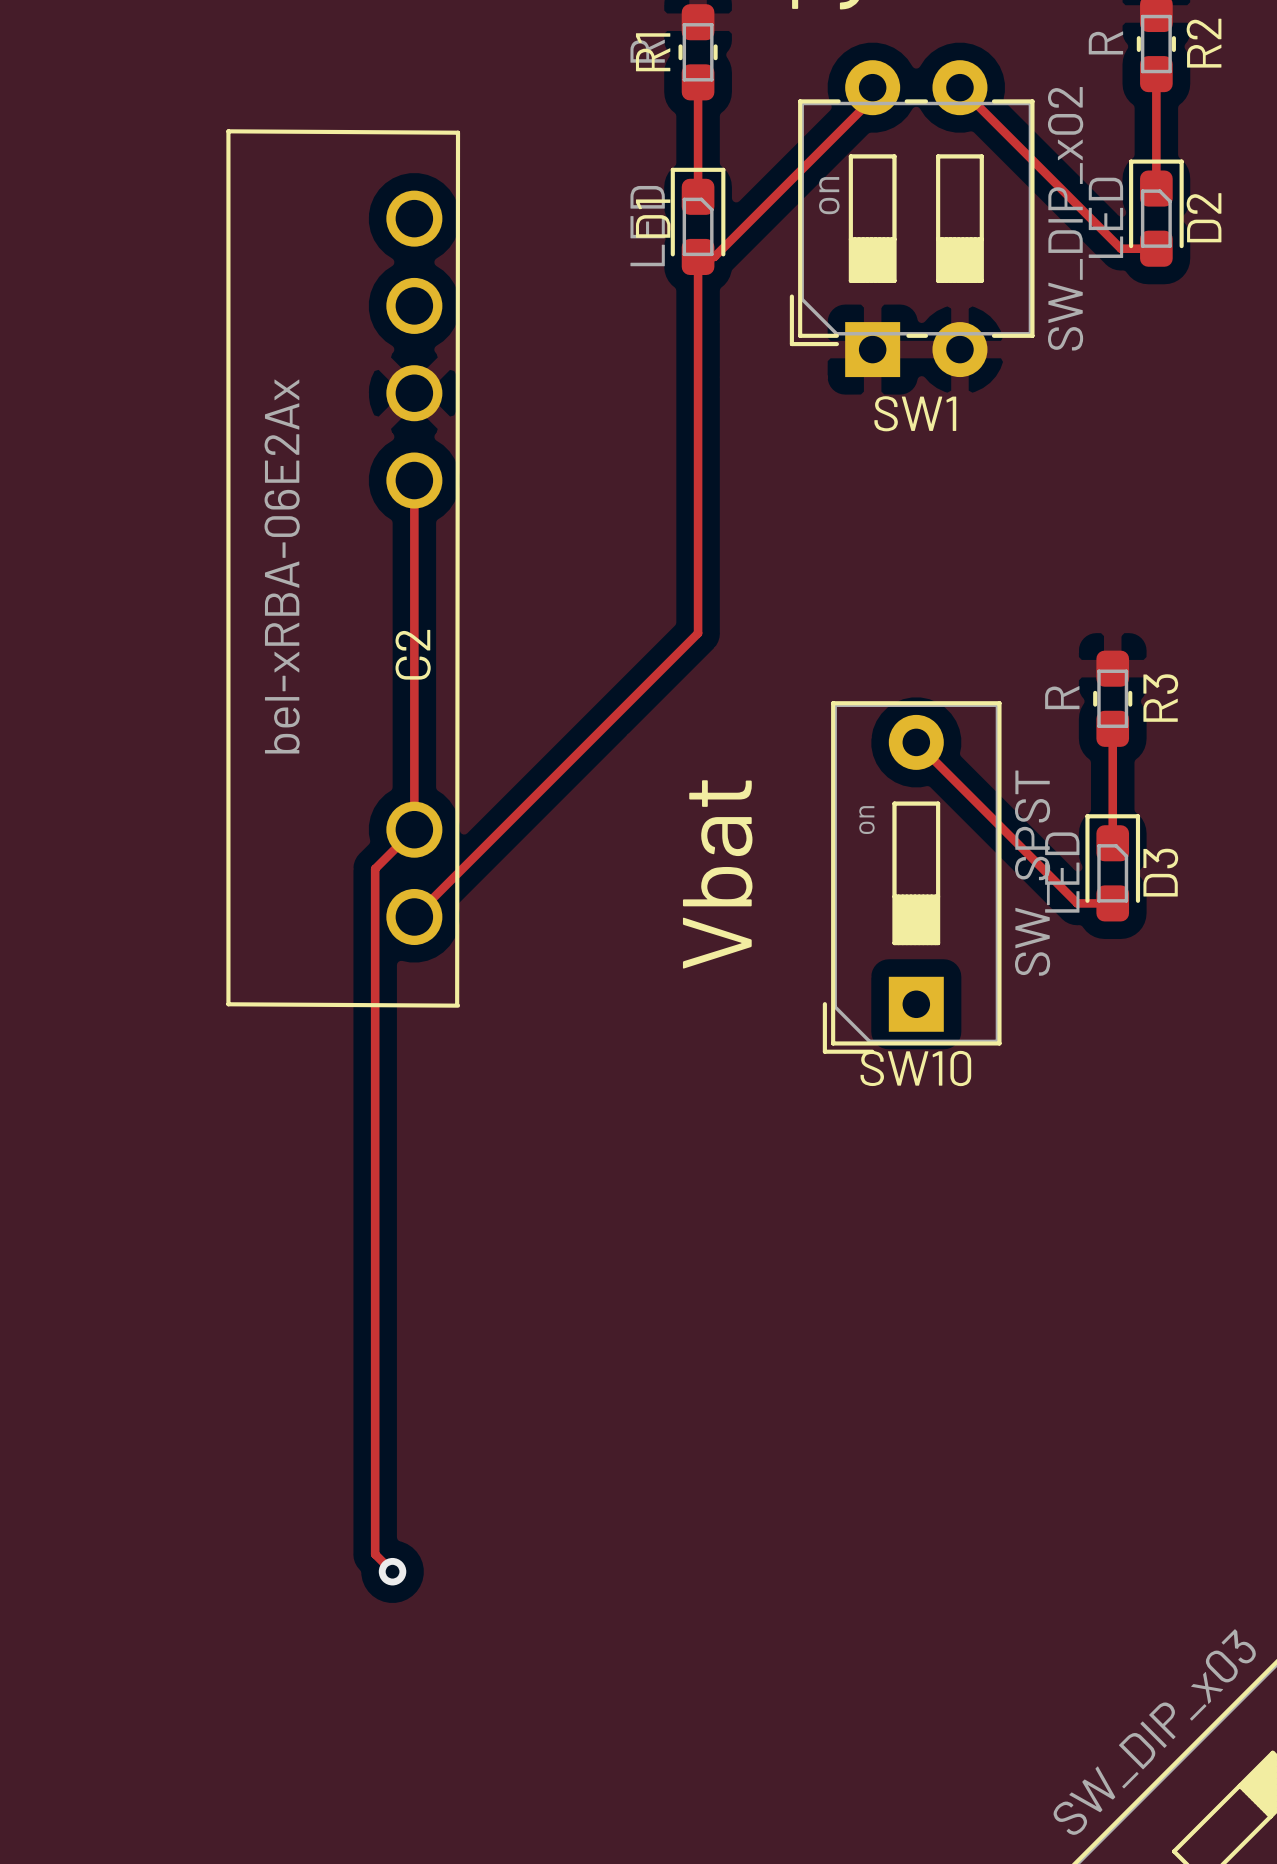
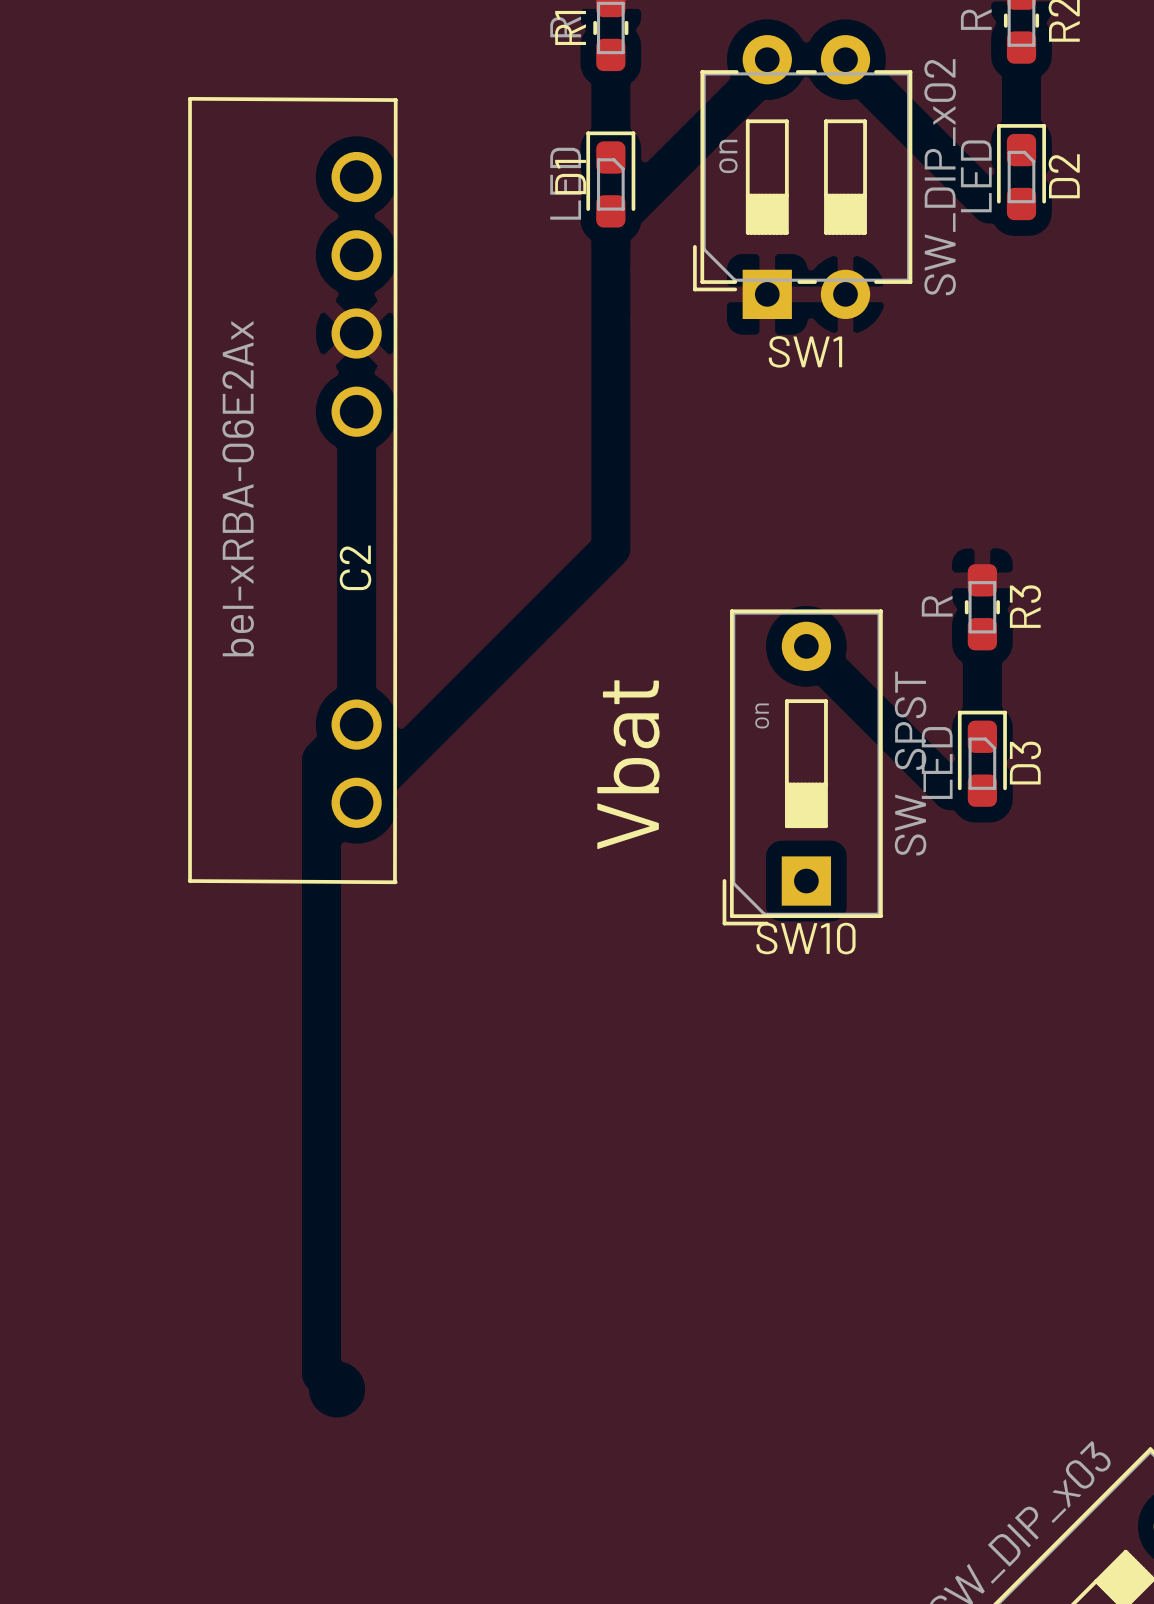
track: (1156, 74) (1156, 188) -> none
track: (698, 82) (698, 196) -> none
track: (872, 87) (872, 98) (714, 256) (698, 256) (698, 633) (414, 916) -> none
track: (959, 87) (1120, 248) (1156, 248) -> none
track: (414, 480) (414, 829) (375, 868) (375, 1554) (392, 1571) -> none
track: (1112, 728) (1112, 843) -> none
track: (916, 742) (1077, 903) (1112, 903) -> none
via: (392, 1571) -> none

